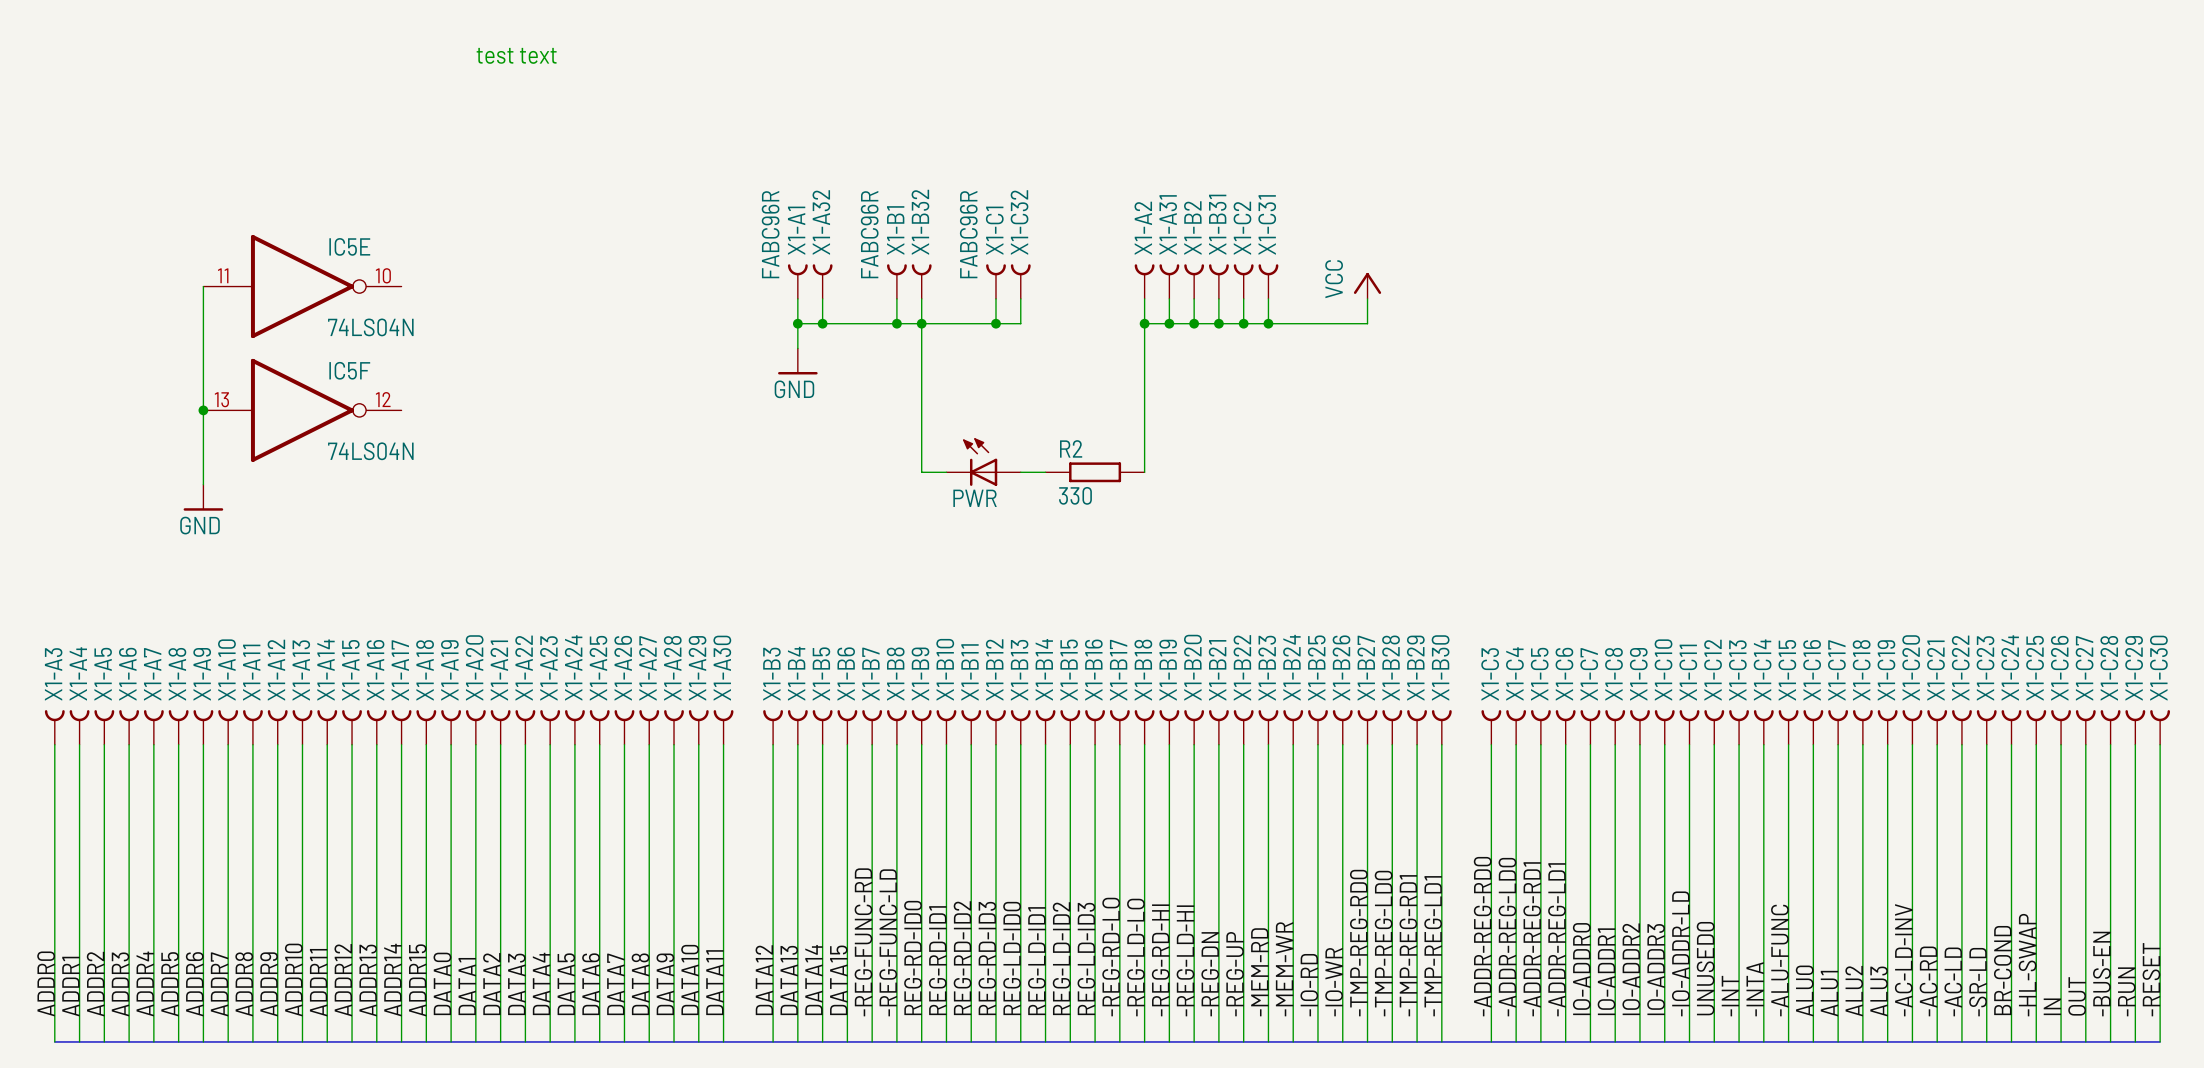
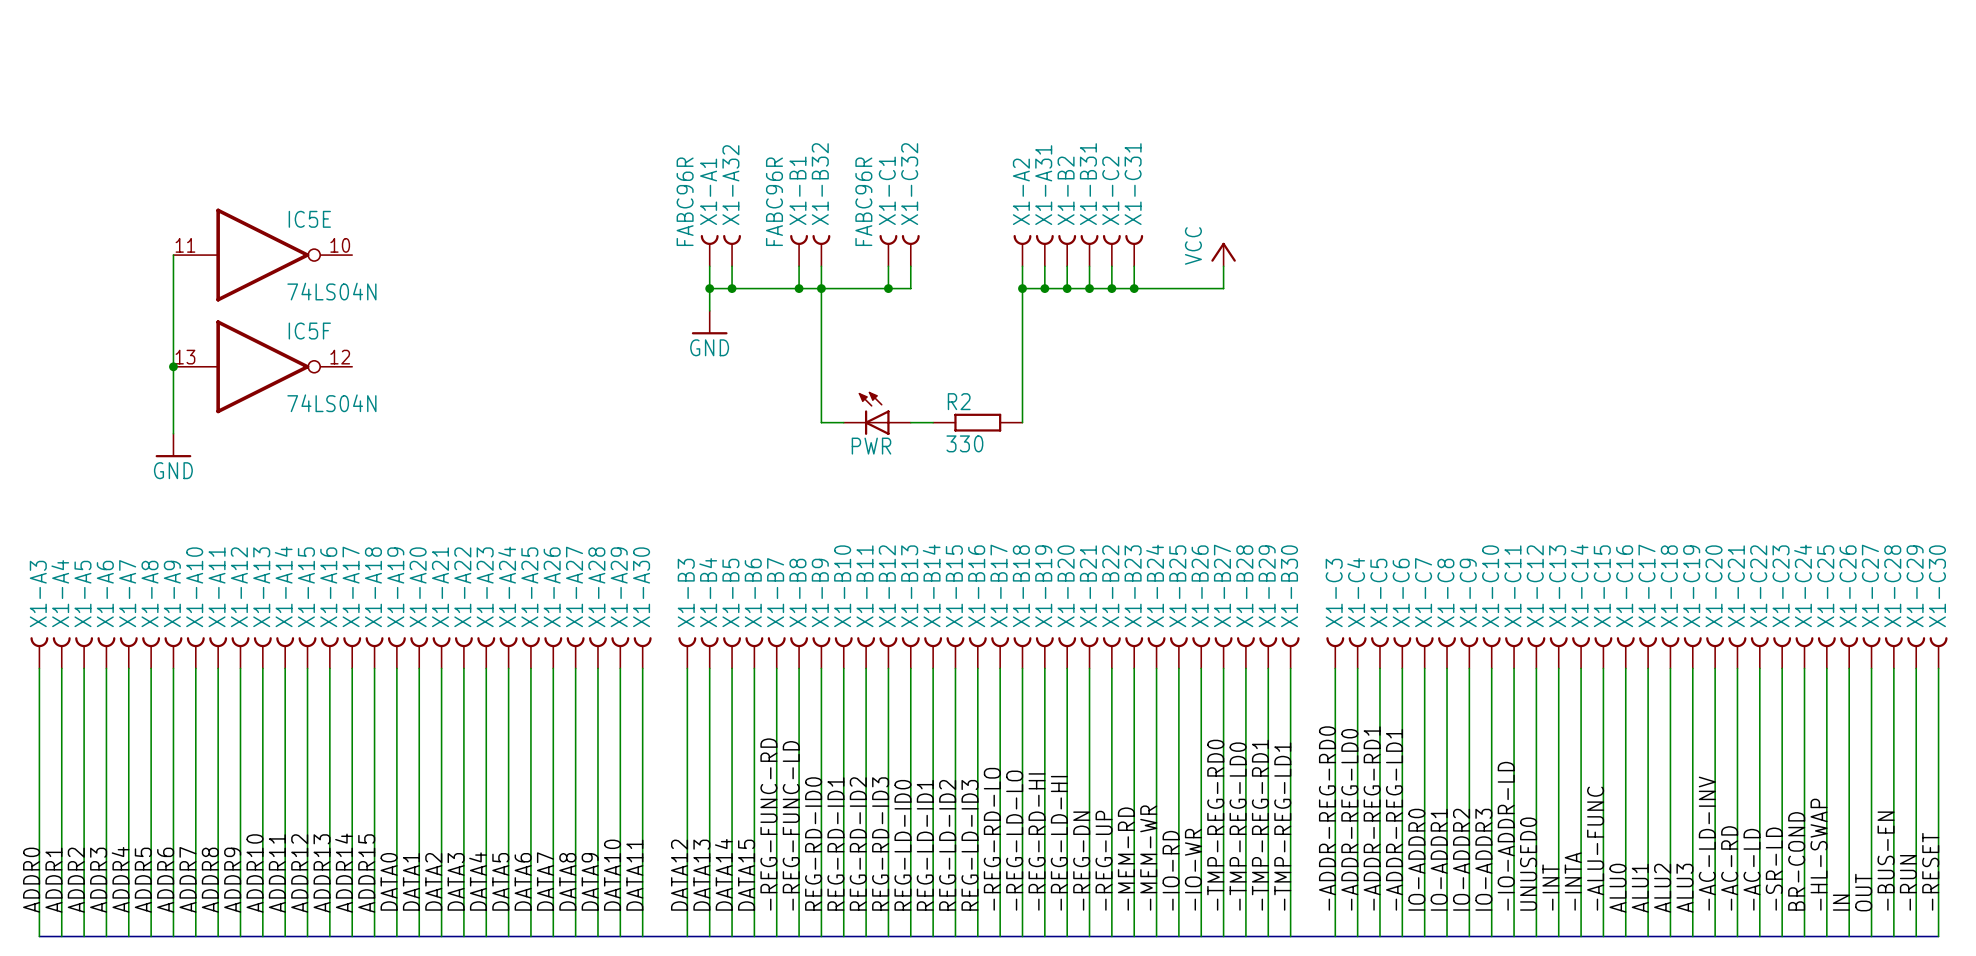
text: test text (516, 55) -> none

